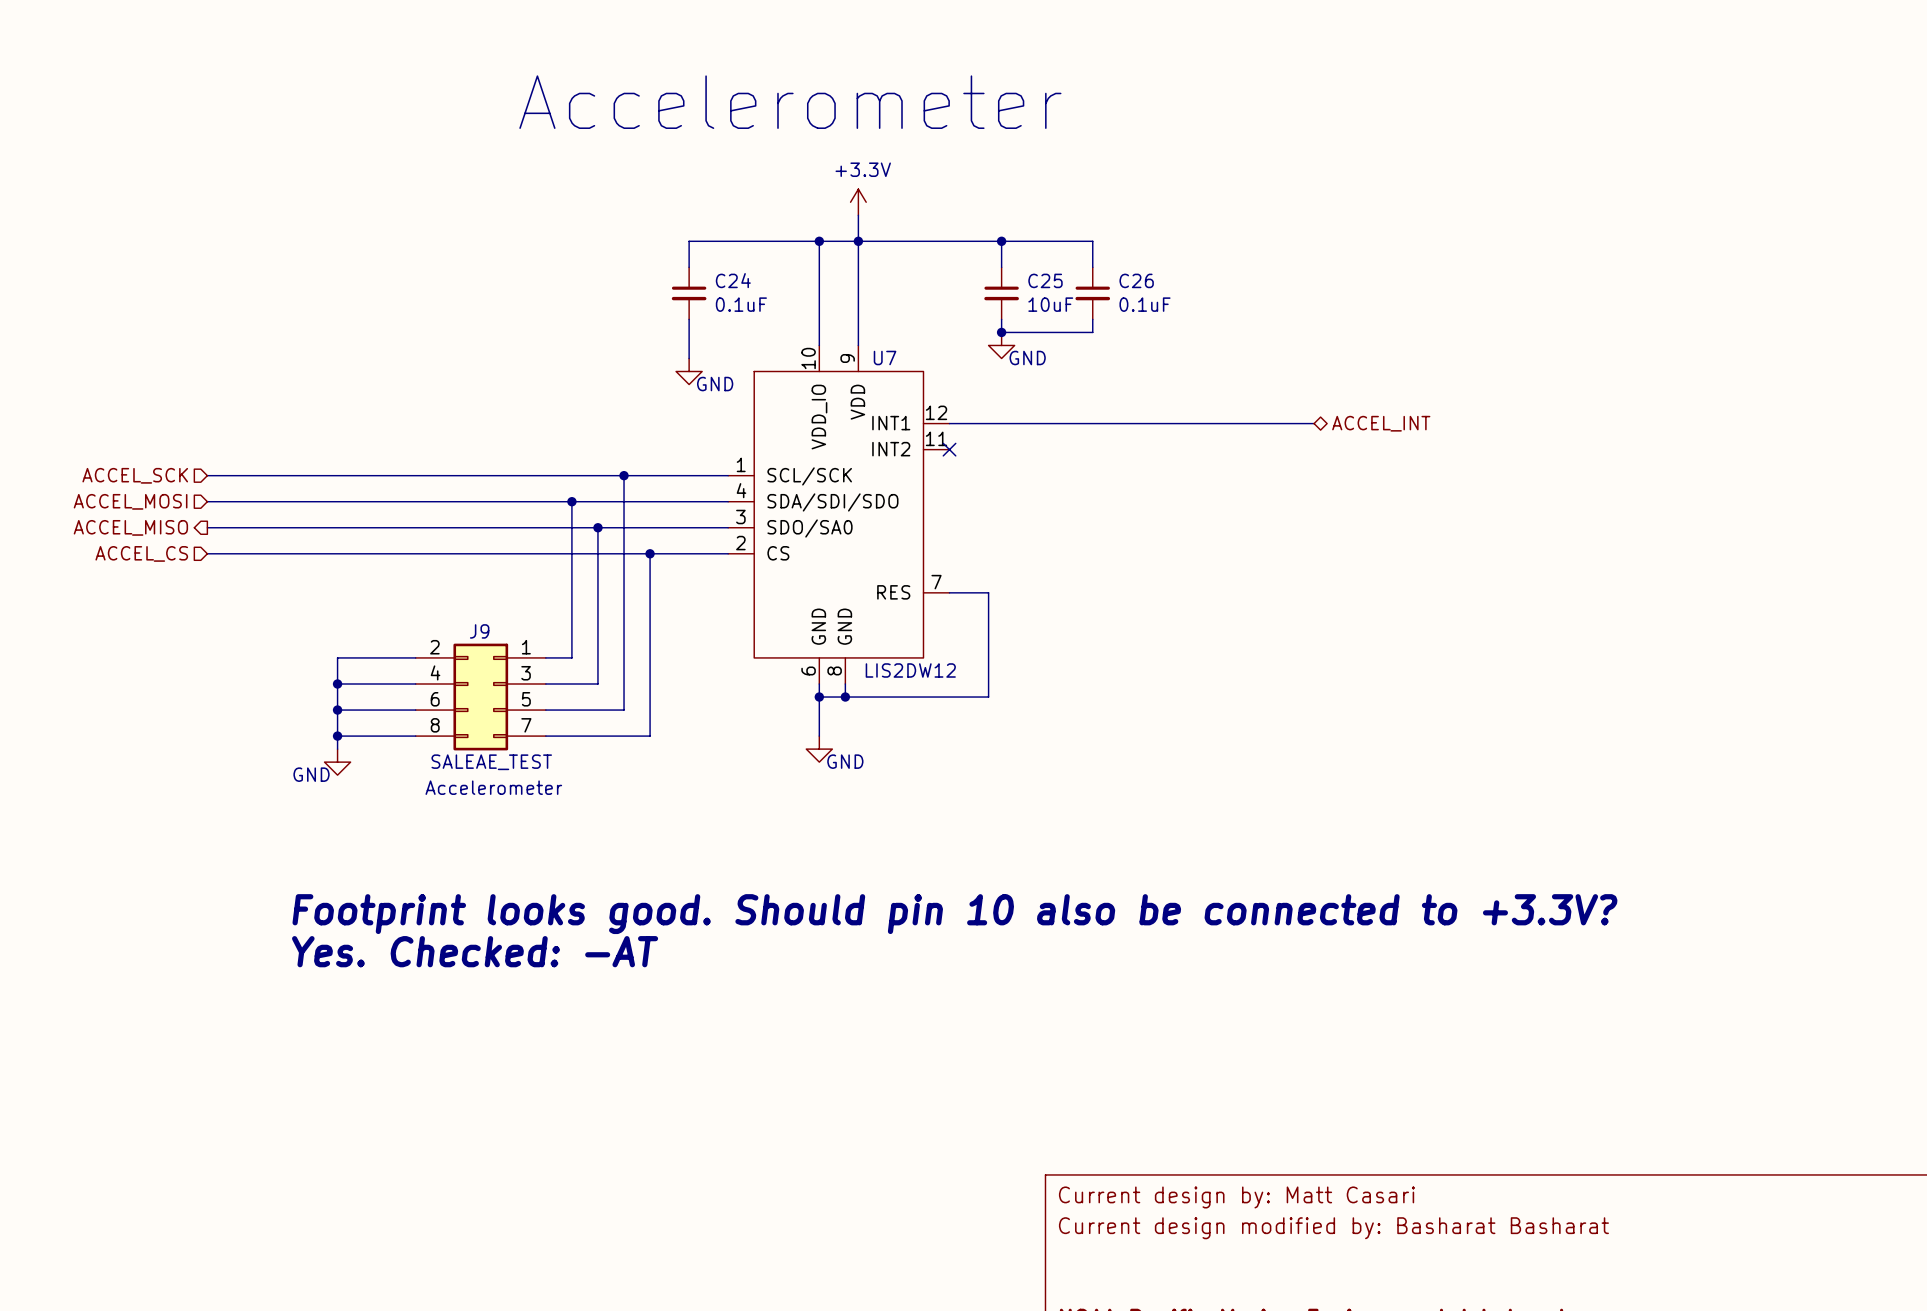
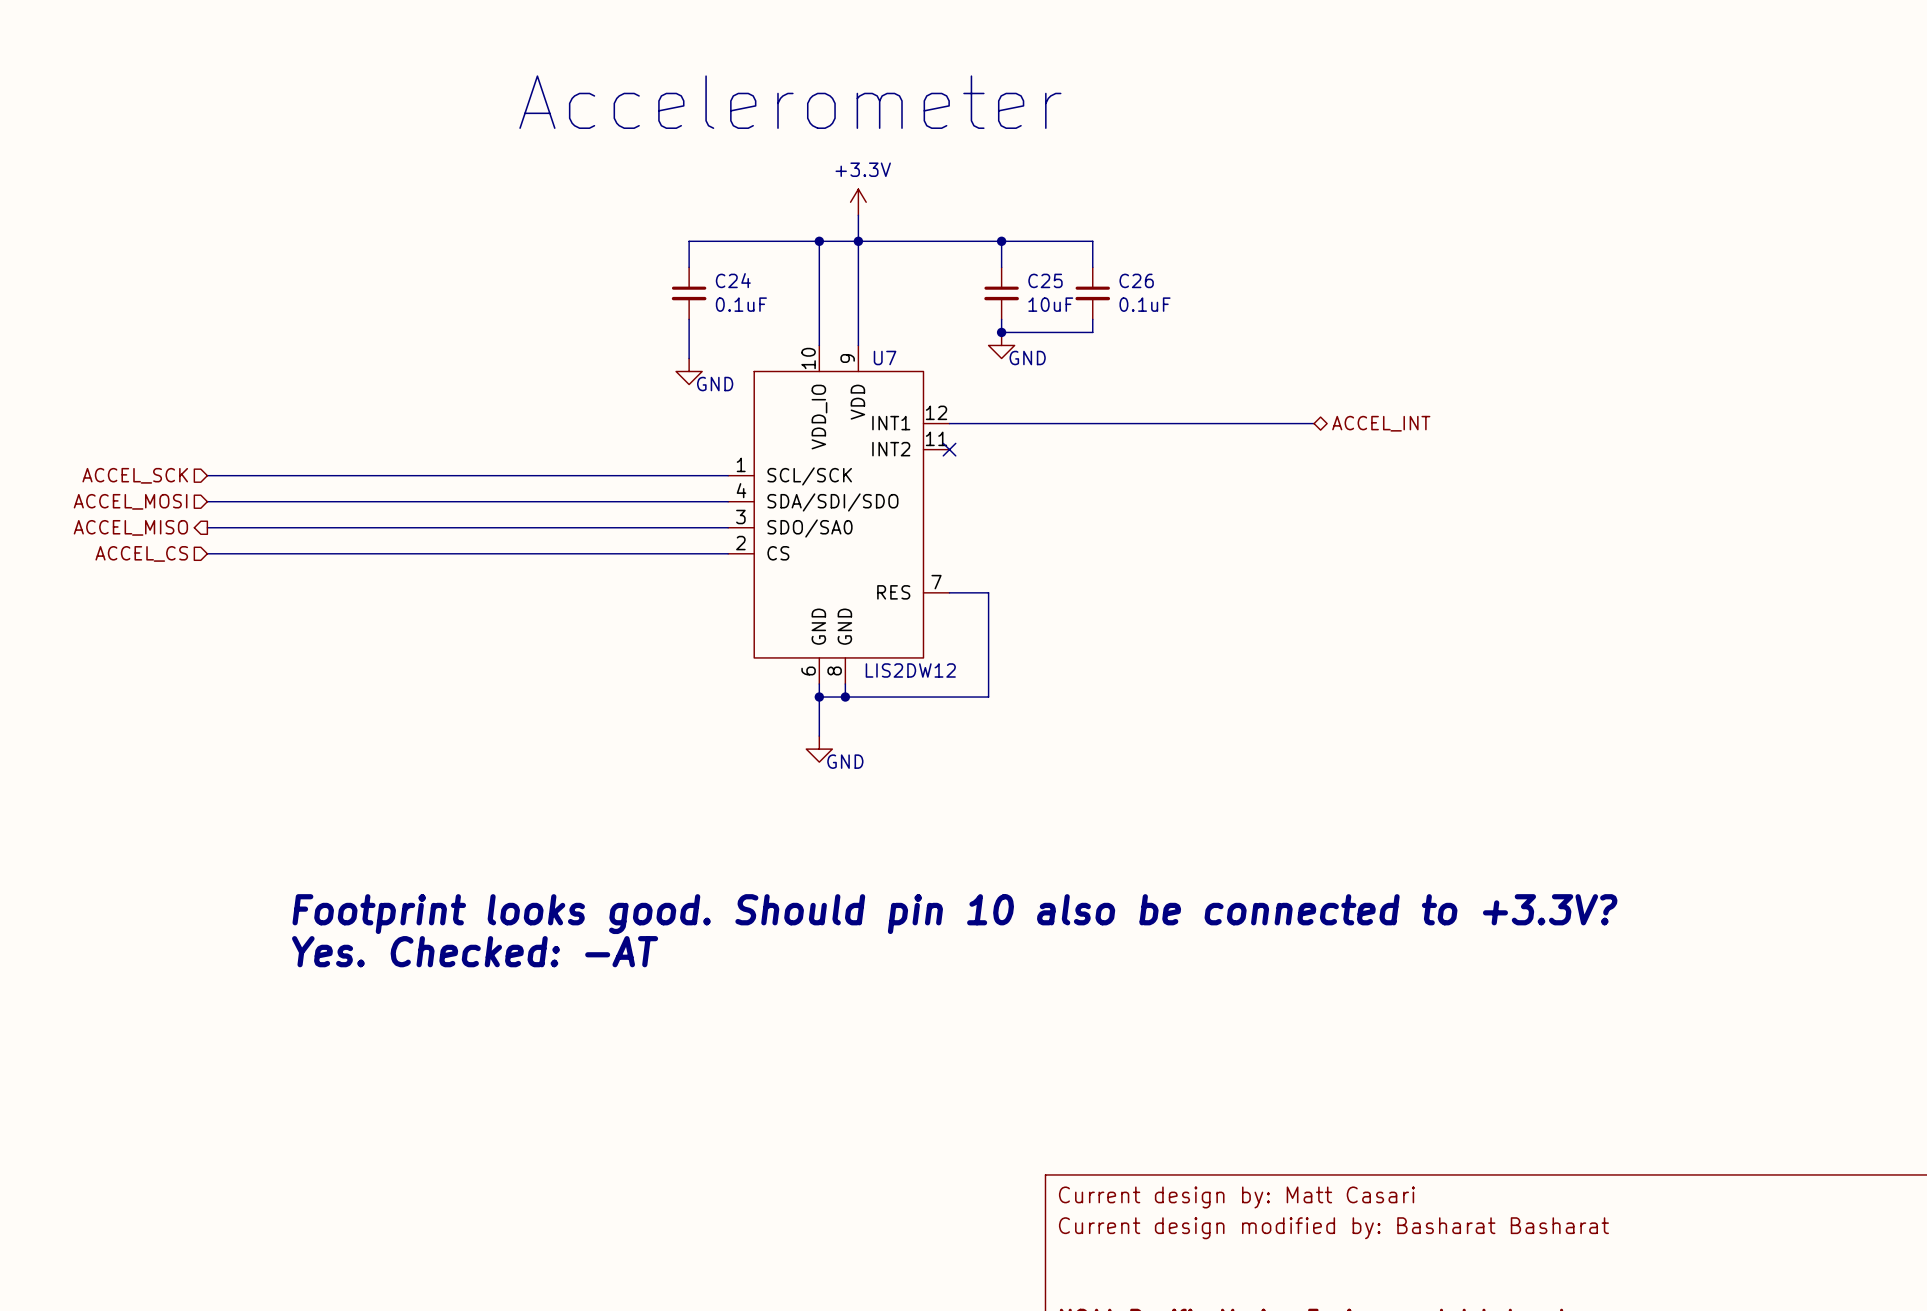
wire: (624, 475) (624, 710) (545, 710) -> none
junction: (624, 475) -> none
wire: (571, 501) (571, 657) (545, 657) -> none
junction: (571, 501) -> none
wire: (597, 527) (597, 684) (545, 684) -> none
junction: (597, 527) -> none
wire: (650, 553) (650, 736) (545, 736) -> none
junction: (650, 553) -> none
wire: (415, 657) (337, 657) (337, 749) -> none
wire: (337, 684) (415, 684) -> none
junction: (337, 684) -> none
J9: SALEAE_TEST (480, 697) -> none
wire: (337, 710) (415, 710) -> none
junction: (337, 710) -> none
wire: (337, 736) (415, 736) -> none
junction: (337, 736) -> none
power symbol: GND (337, 762) -> none

